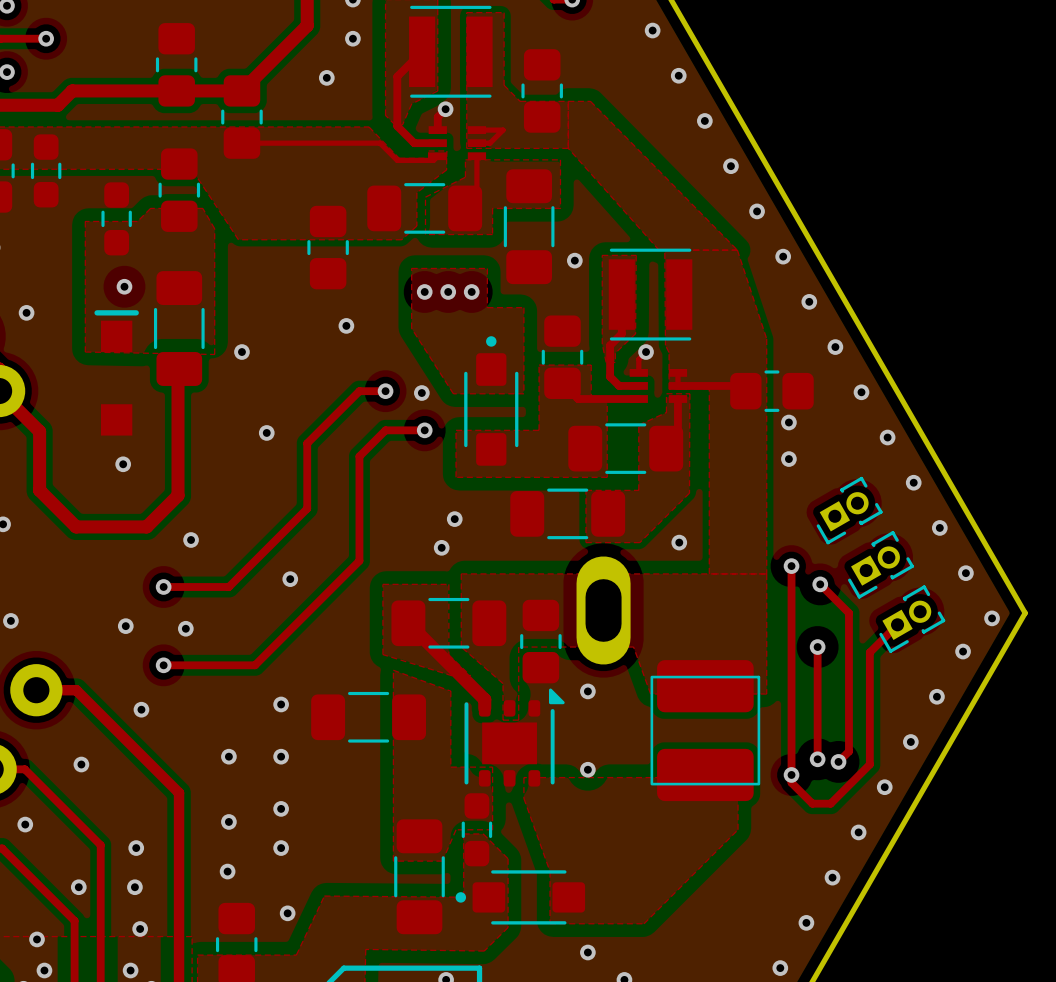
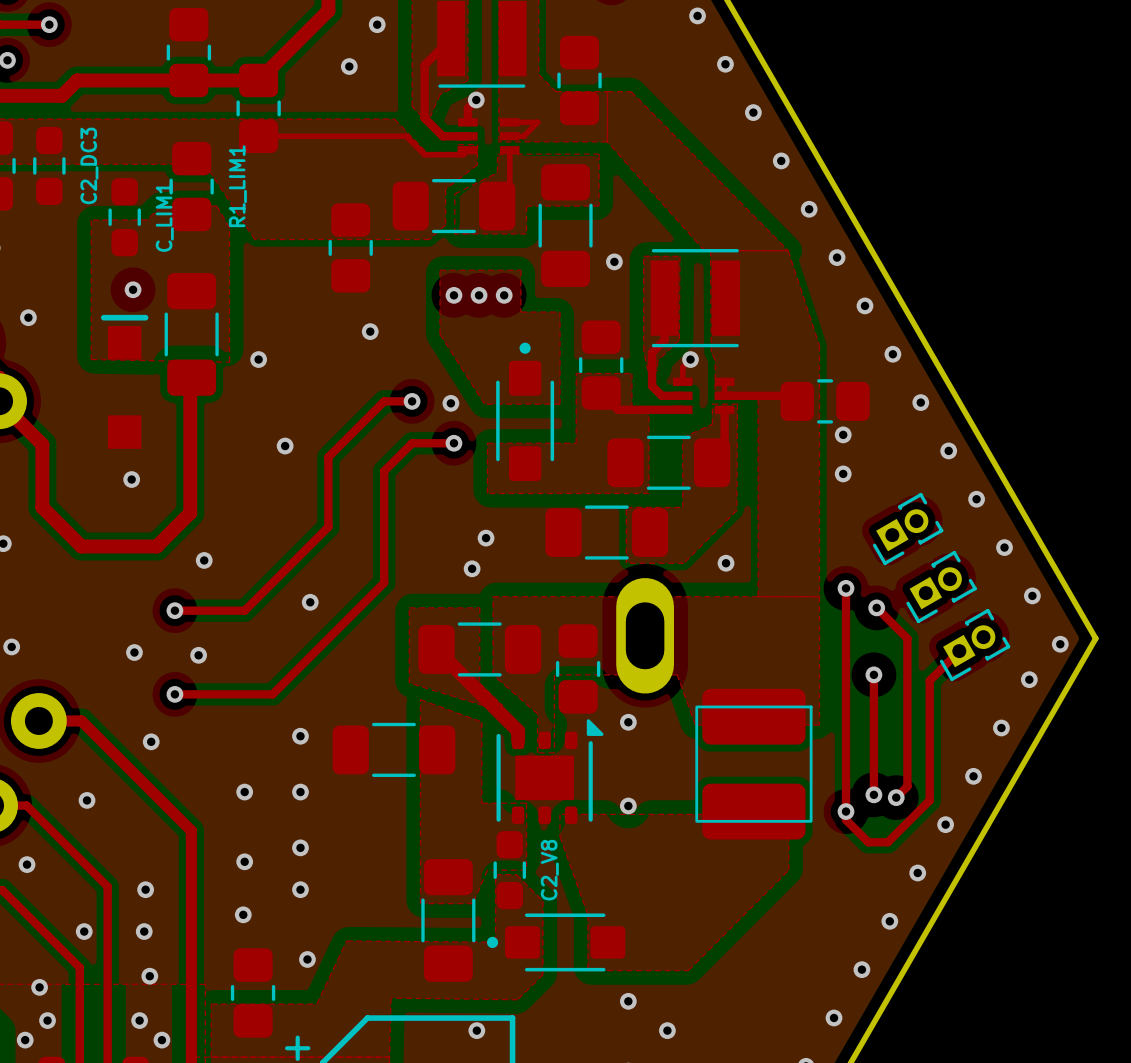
C2_DC3 name: none -> C2_DC3 (89, 165)
R1_LIM1 name: none -> R1_LIM1 (237, 186)
C_LIM1 name: none -> C_LIM1 (164, 217)
C2_V8 name: none -> C2_V8 (549, 870)

